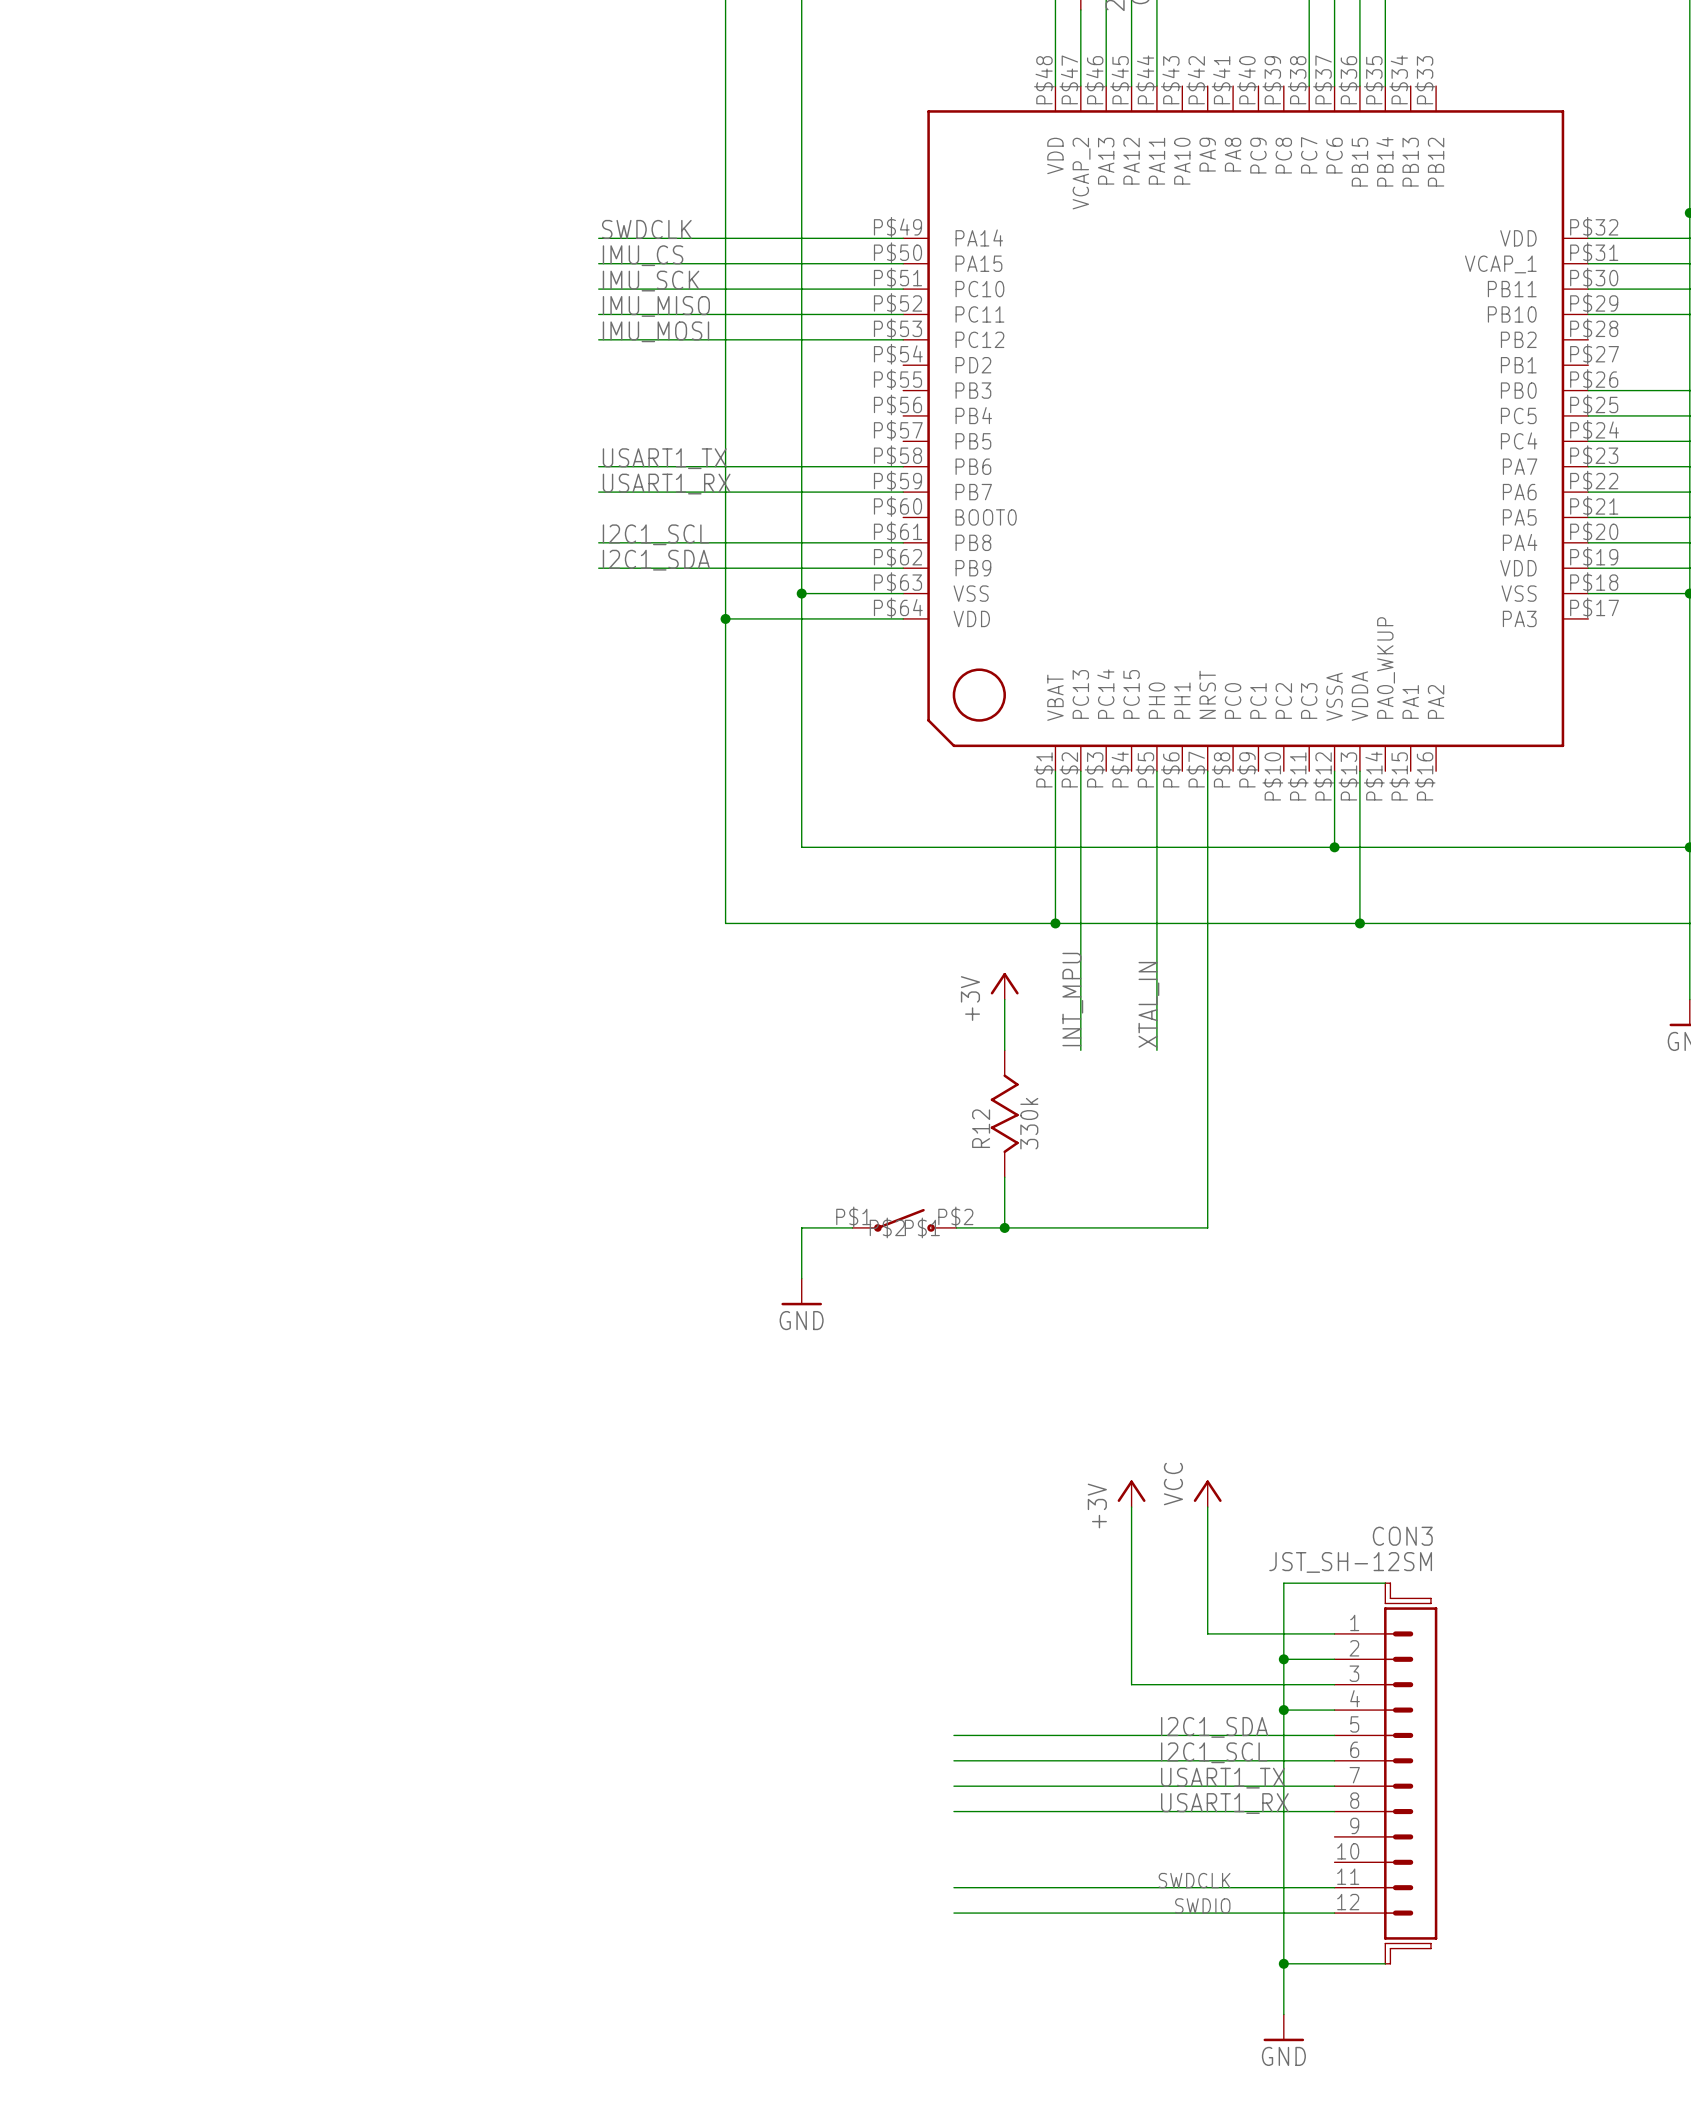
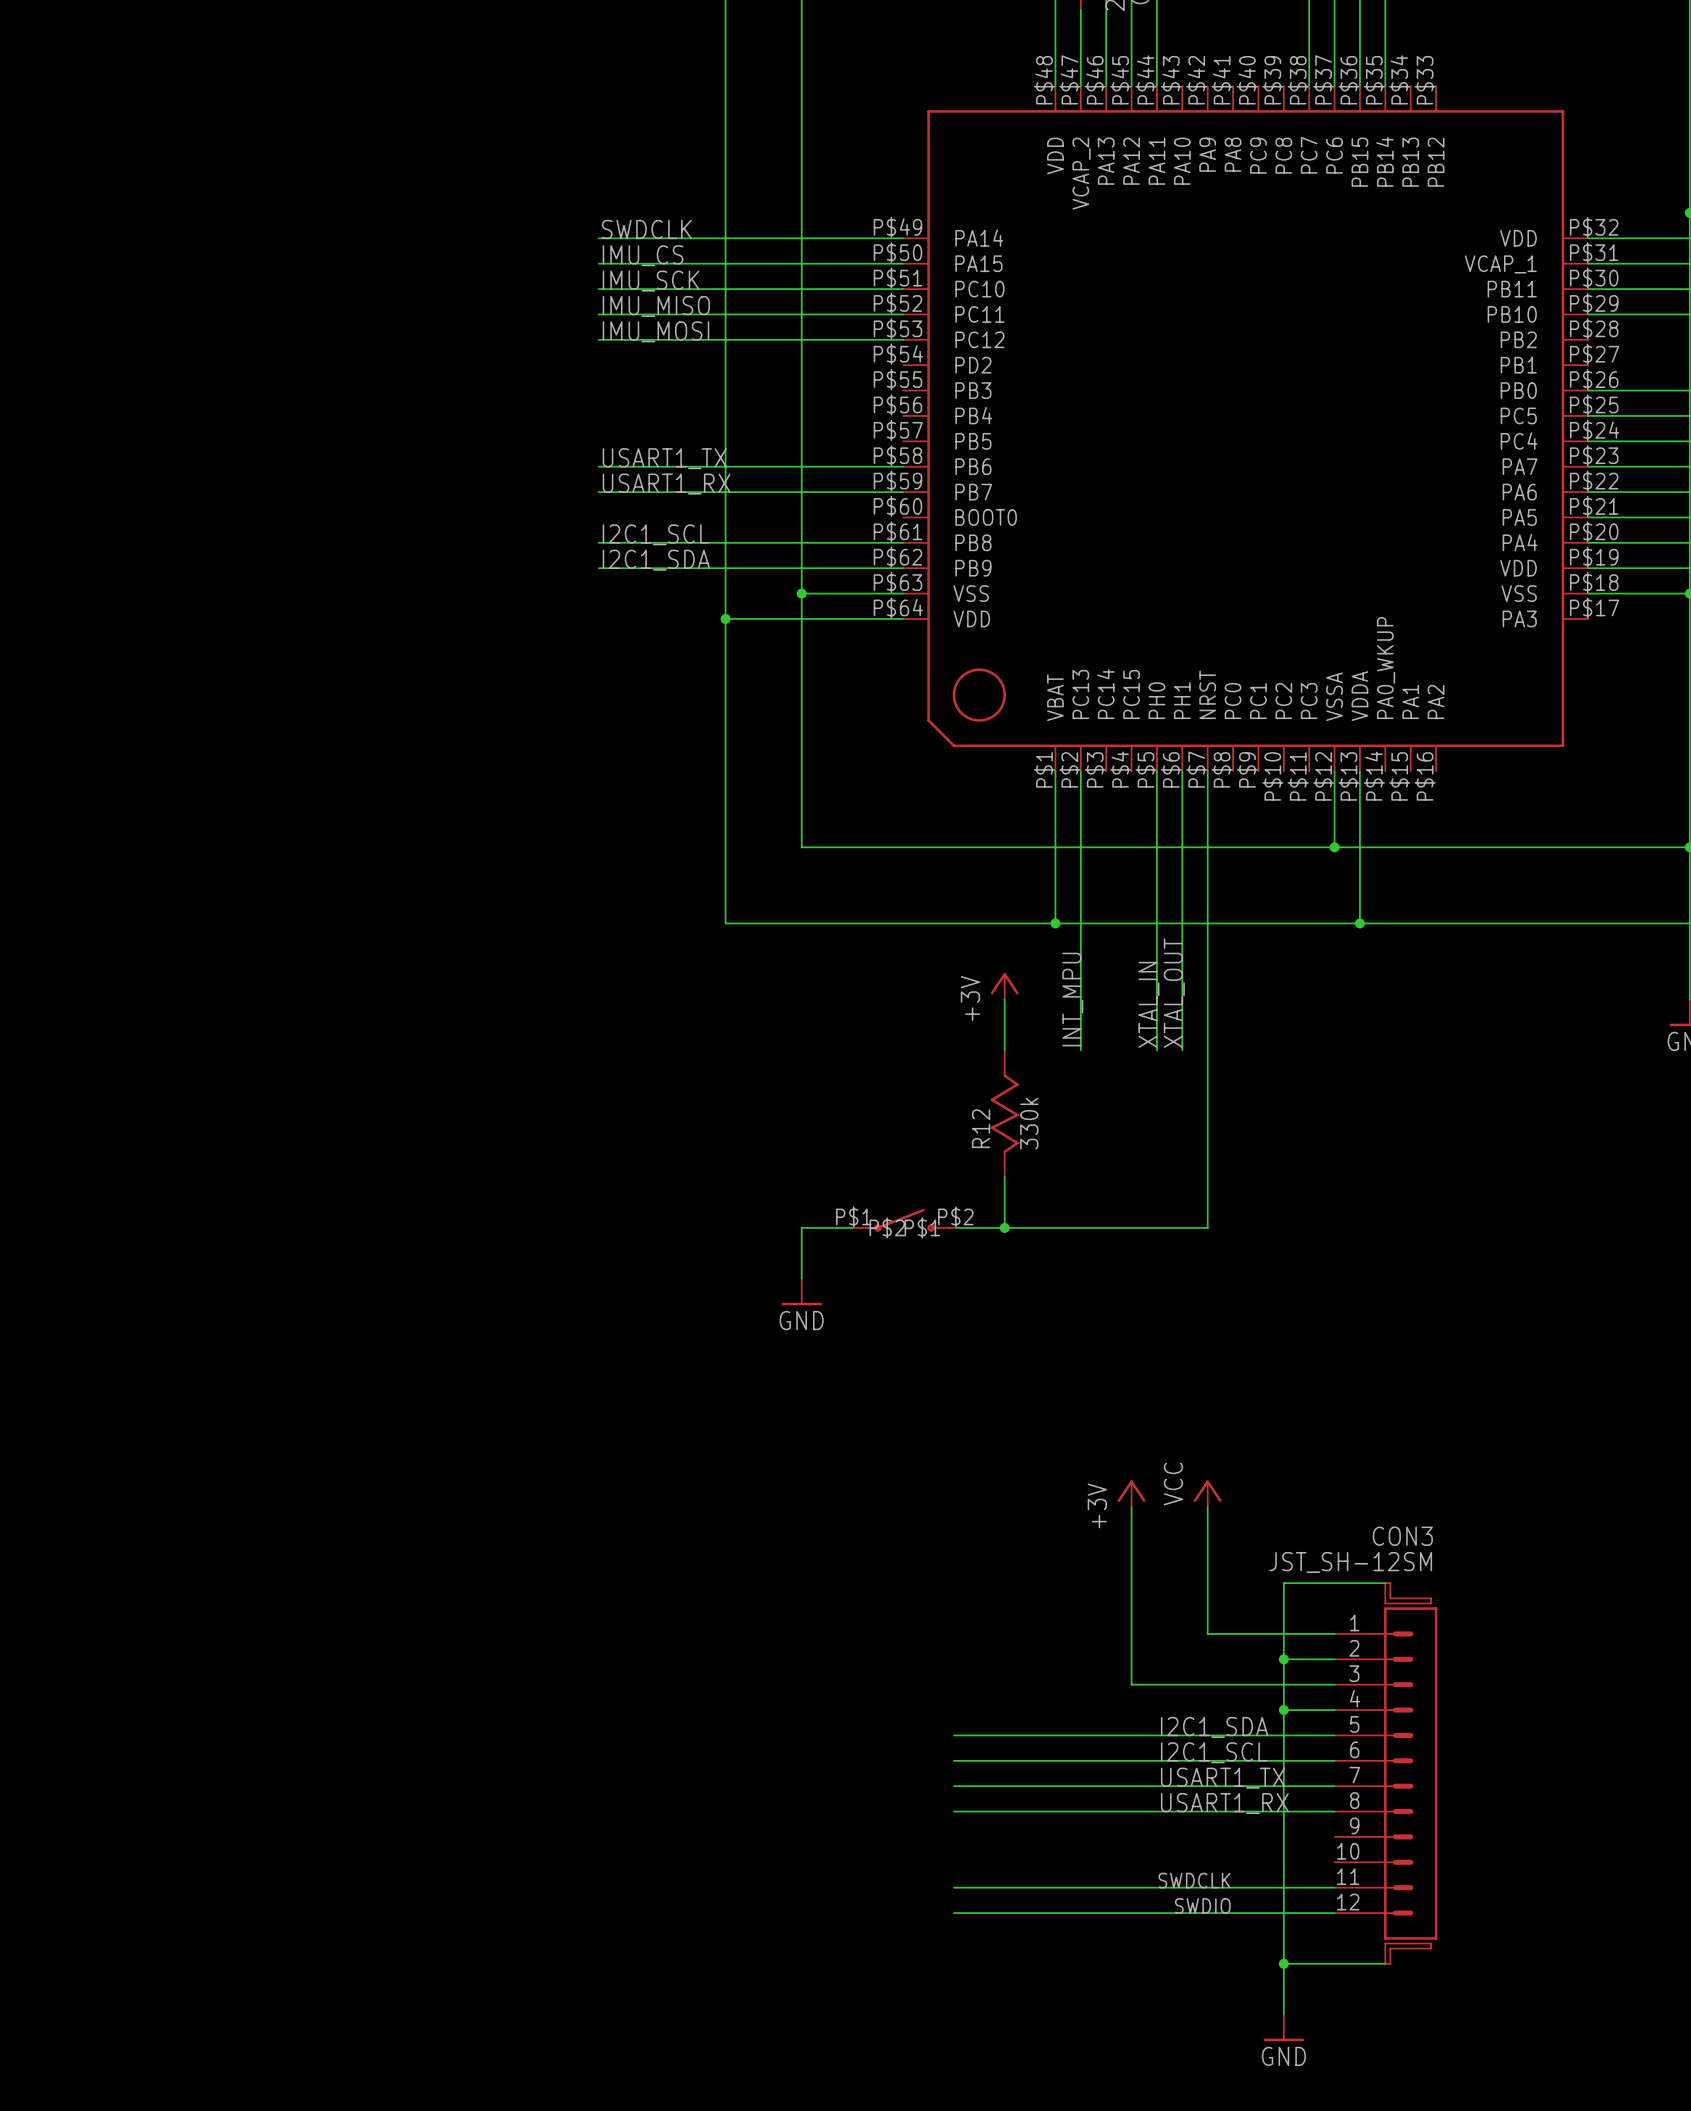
wire: none -> (1182, 771) (1182, 1050)
label: none -> XTAL_OUT (1174, 993)

